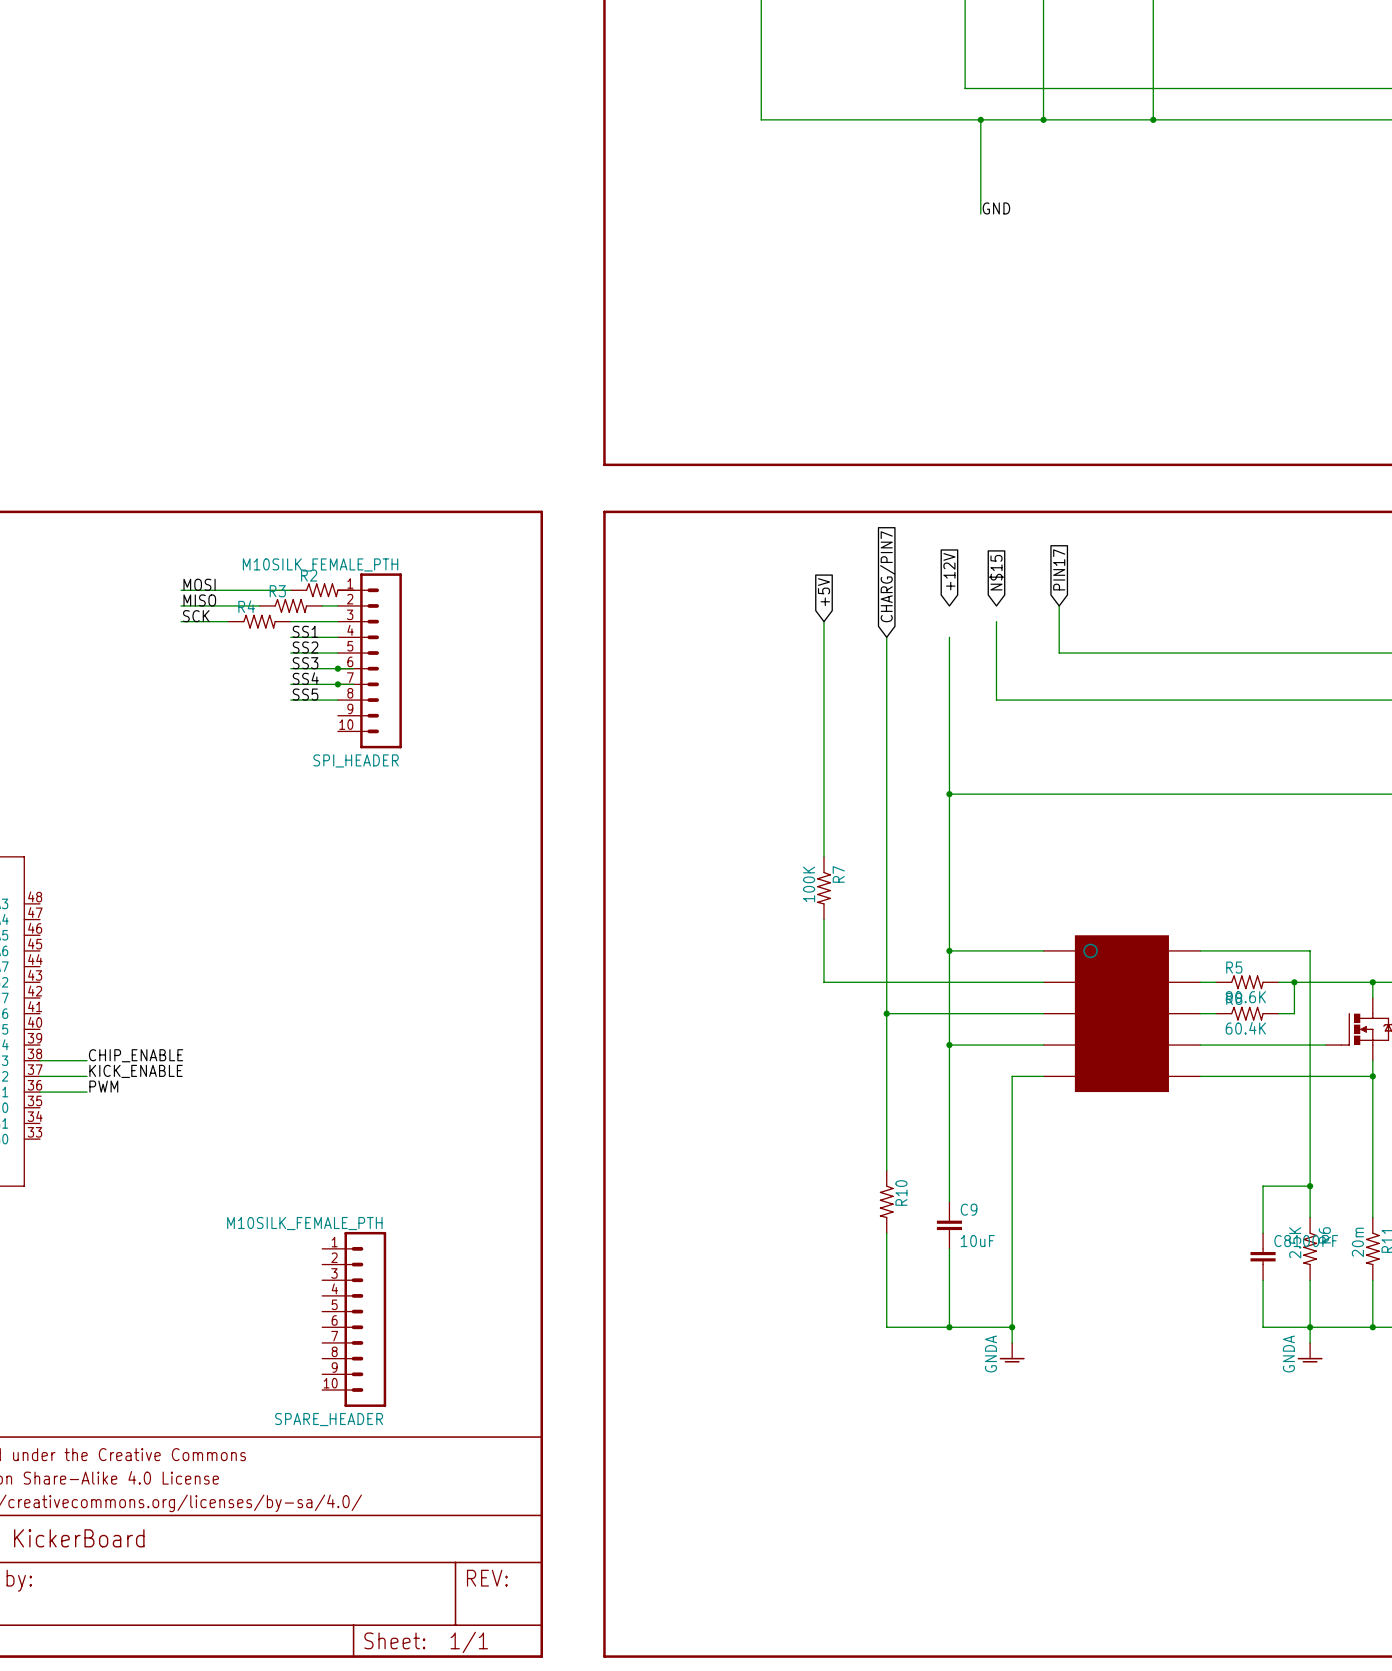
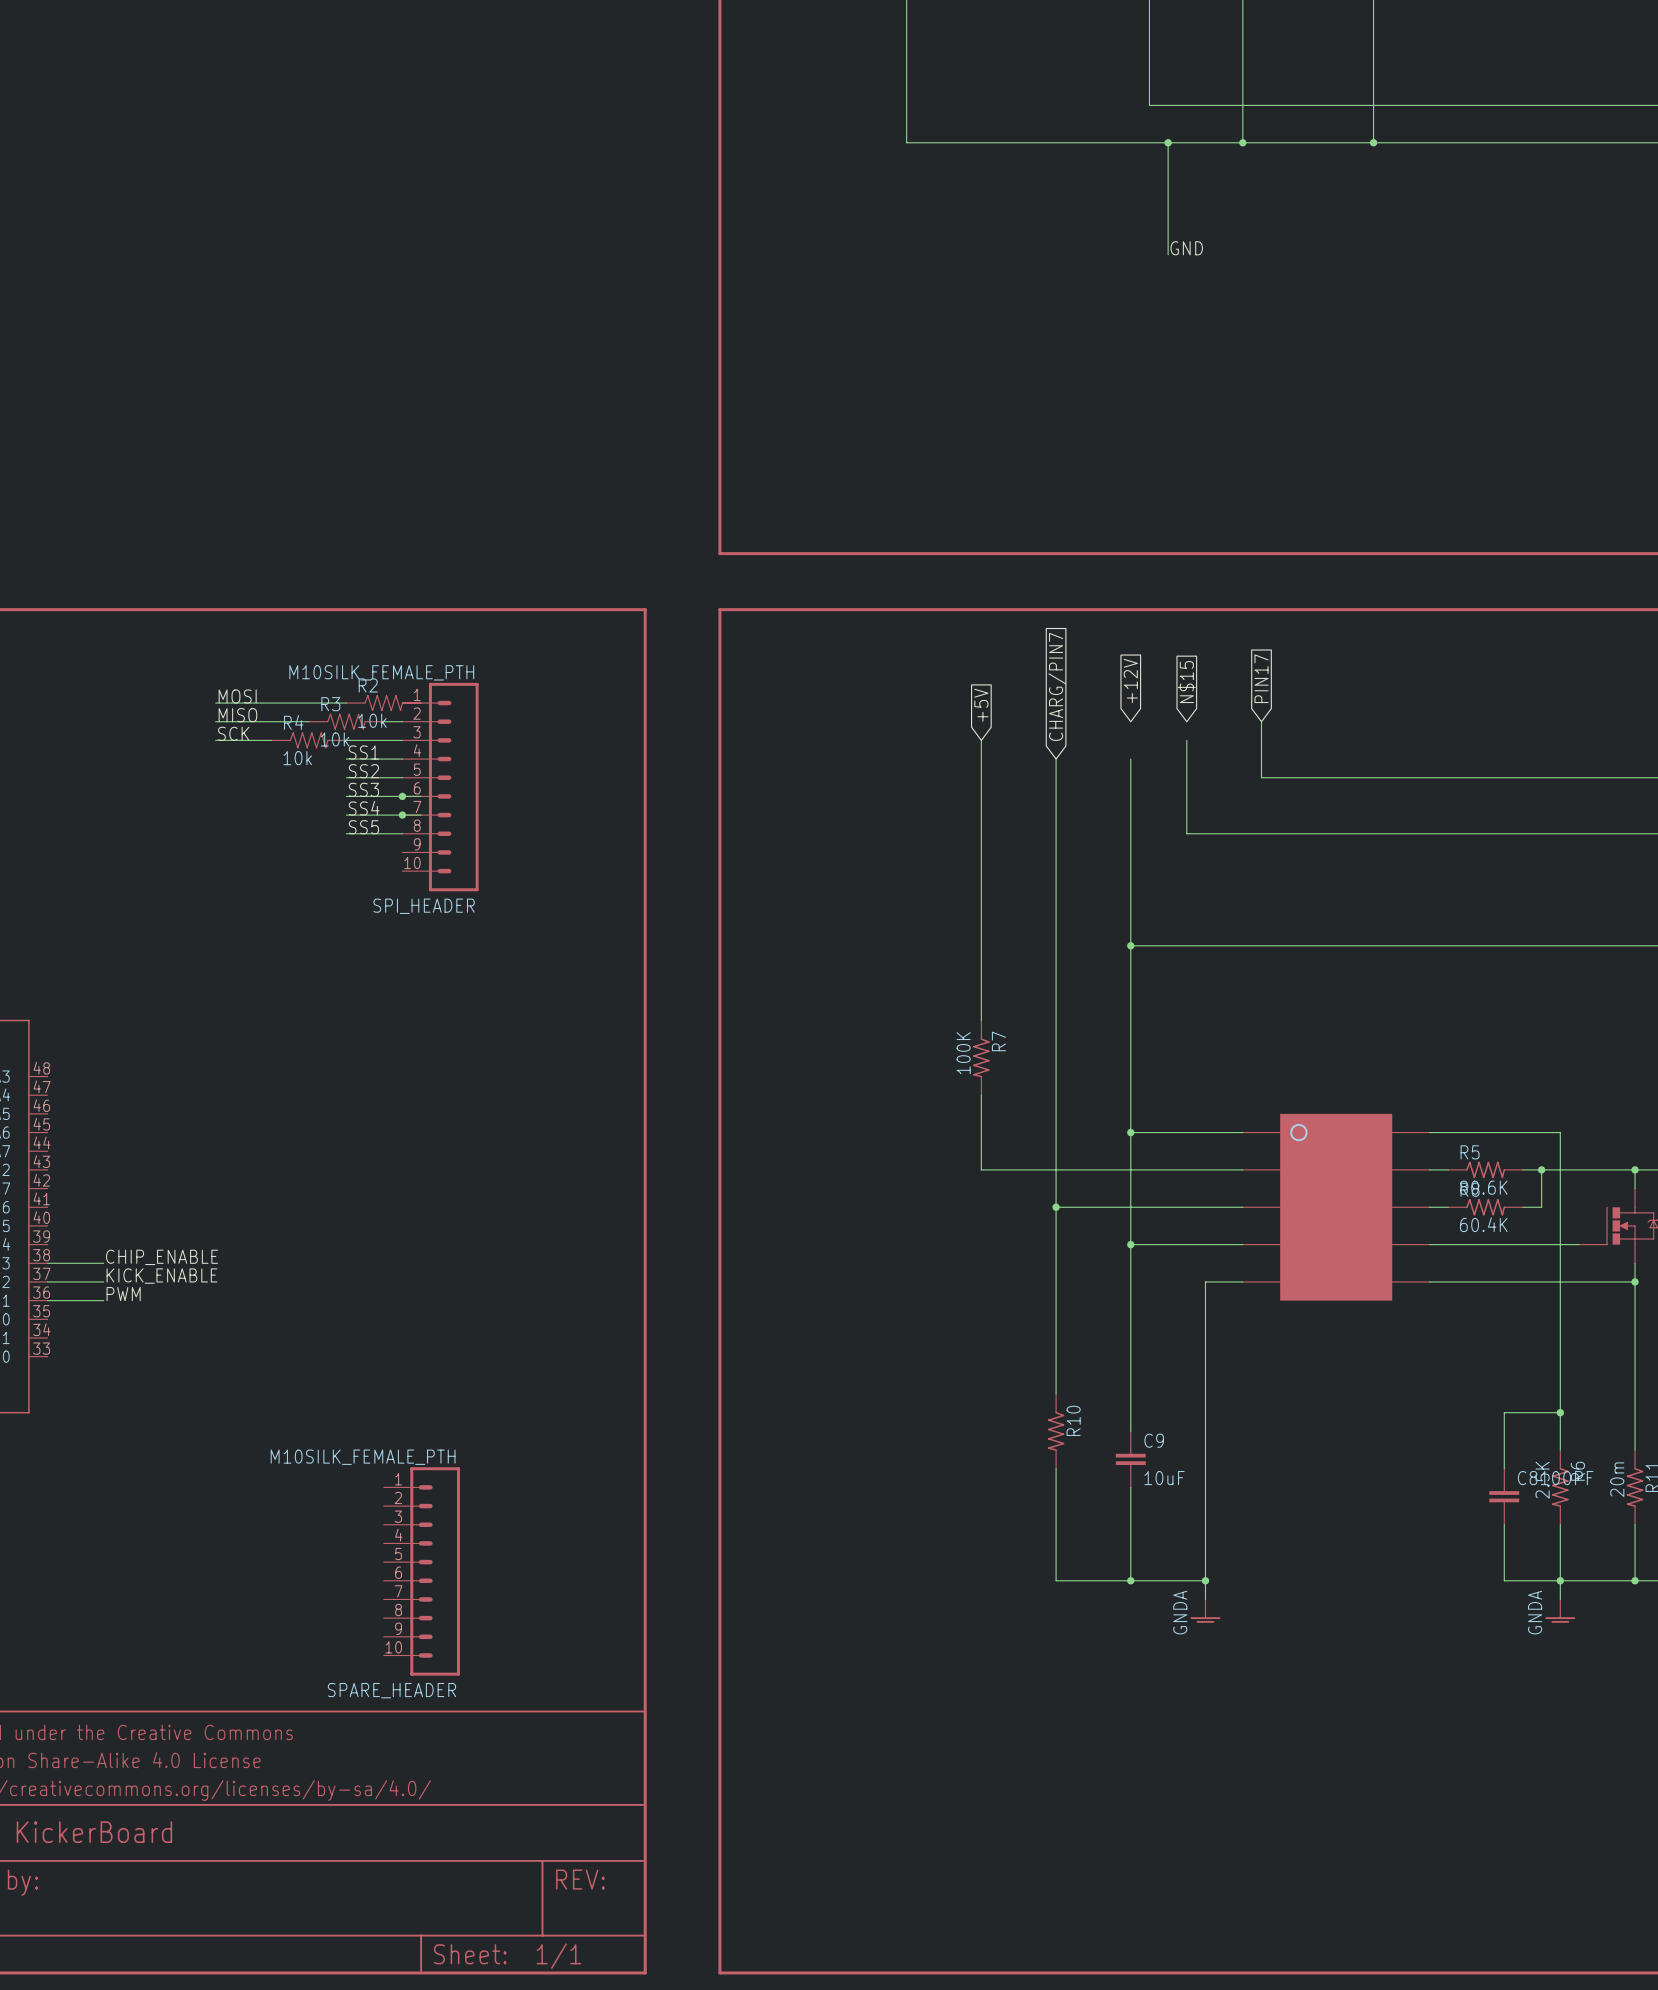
R2 value: none -> 10k (372, 720)
R3 value: none -> 10k (335, 739)
R4 value: none -> 10k (297, 758)

